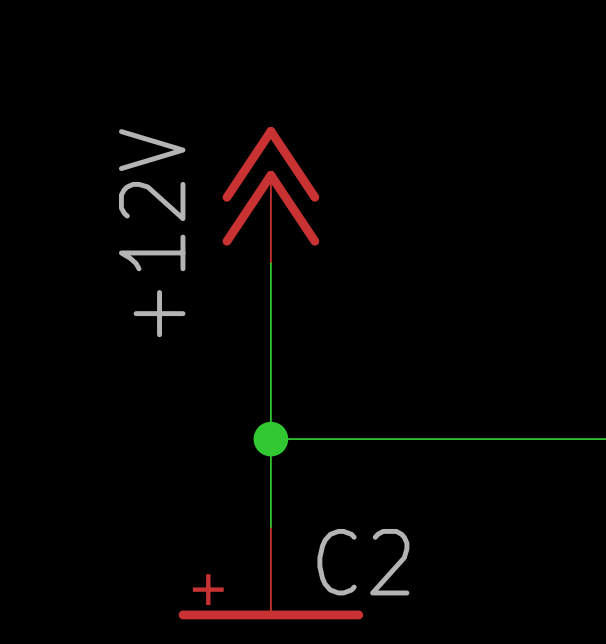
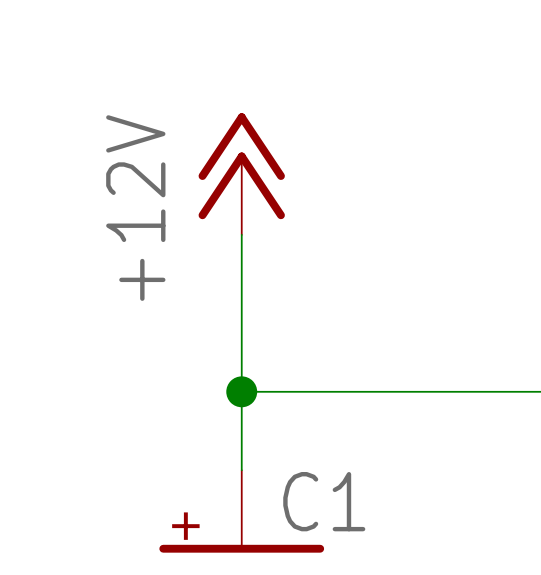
C2 name: C2 (363, 562) -> C1 (324, 501)

